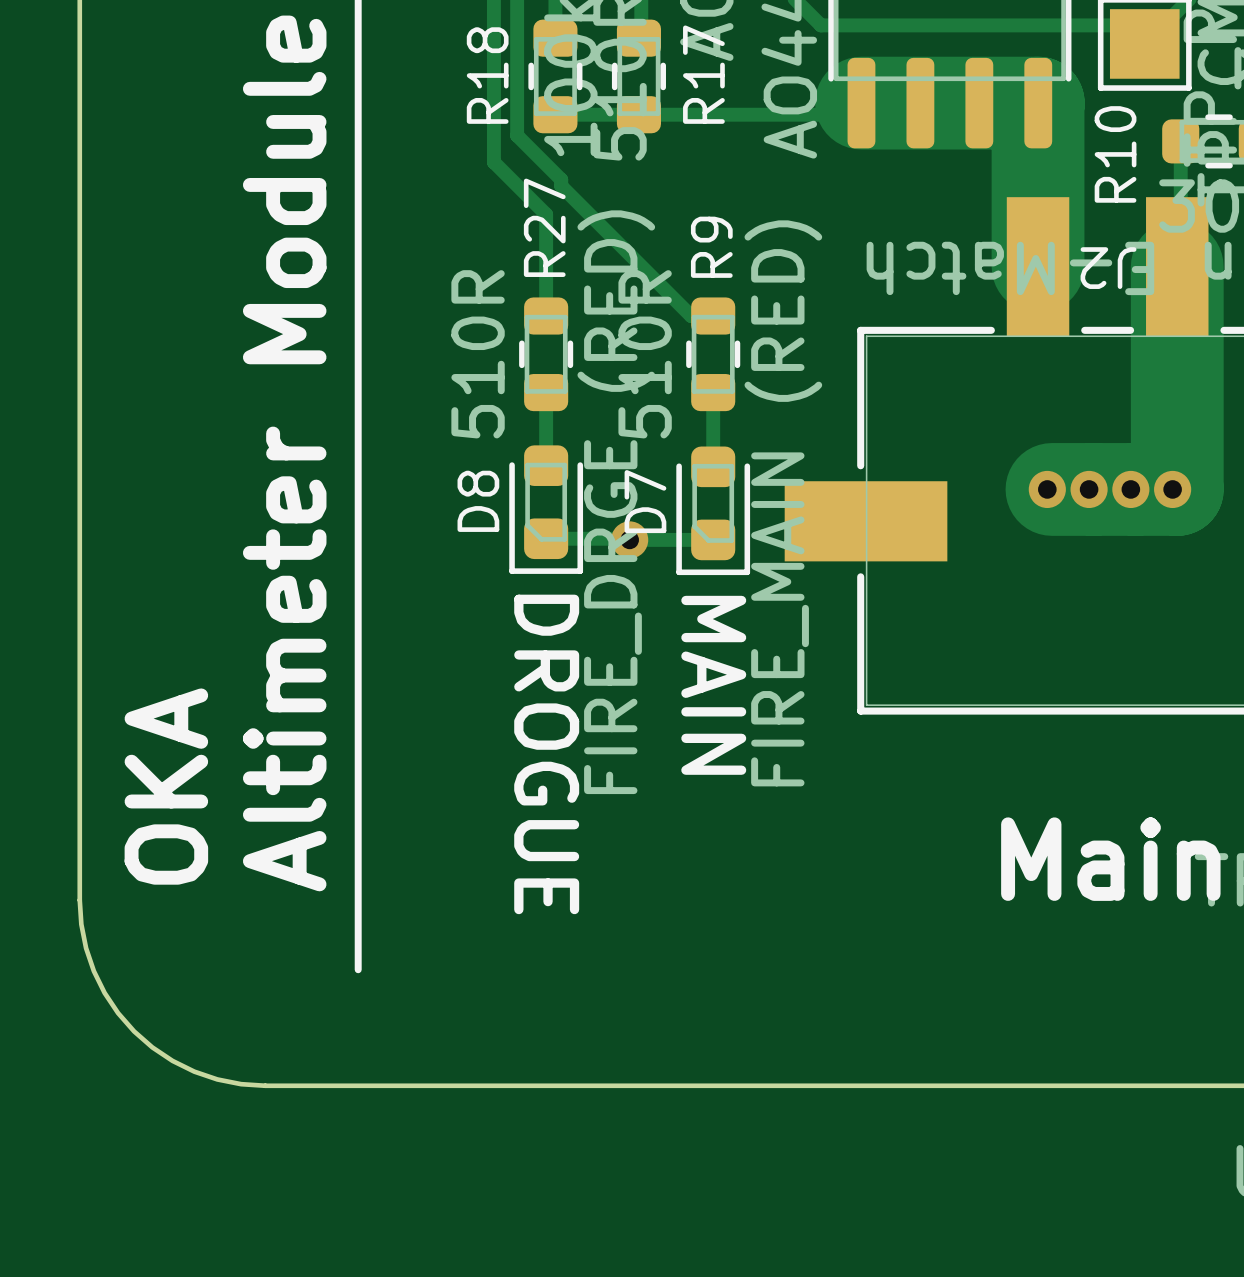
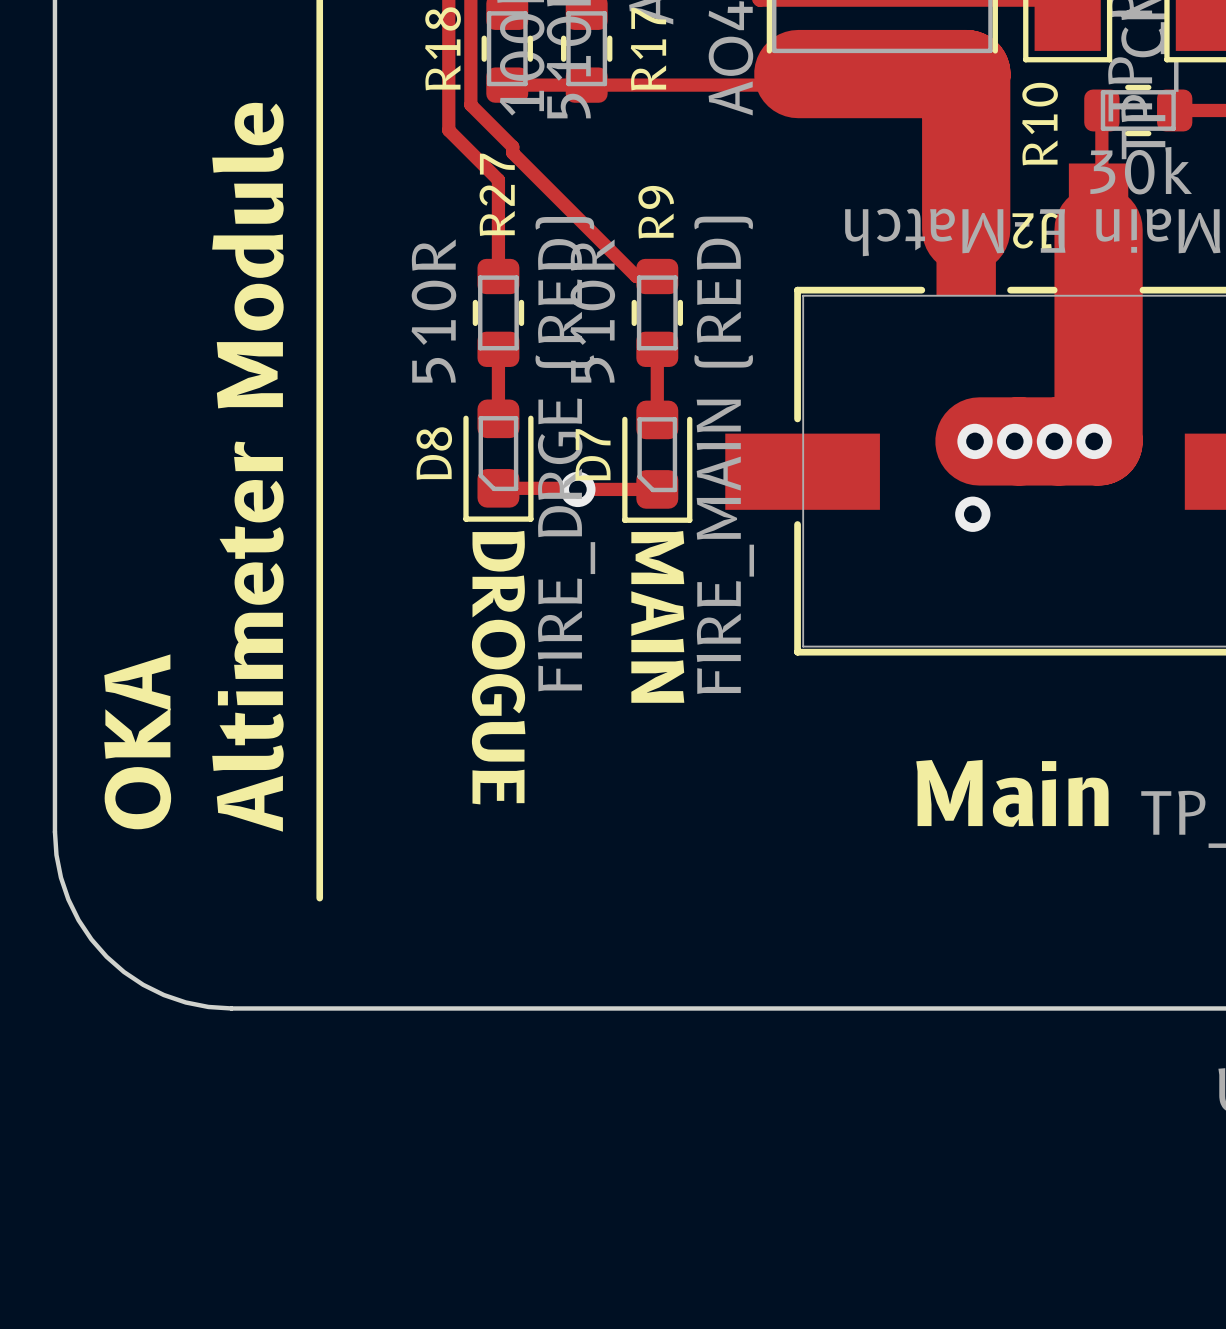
via: none -> (972, 514)

